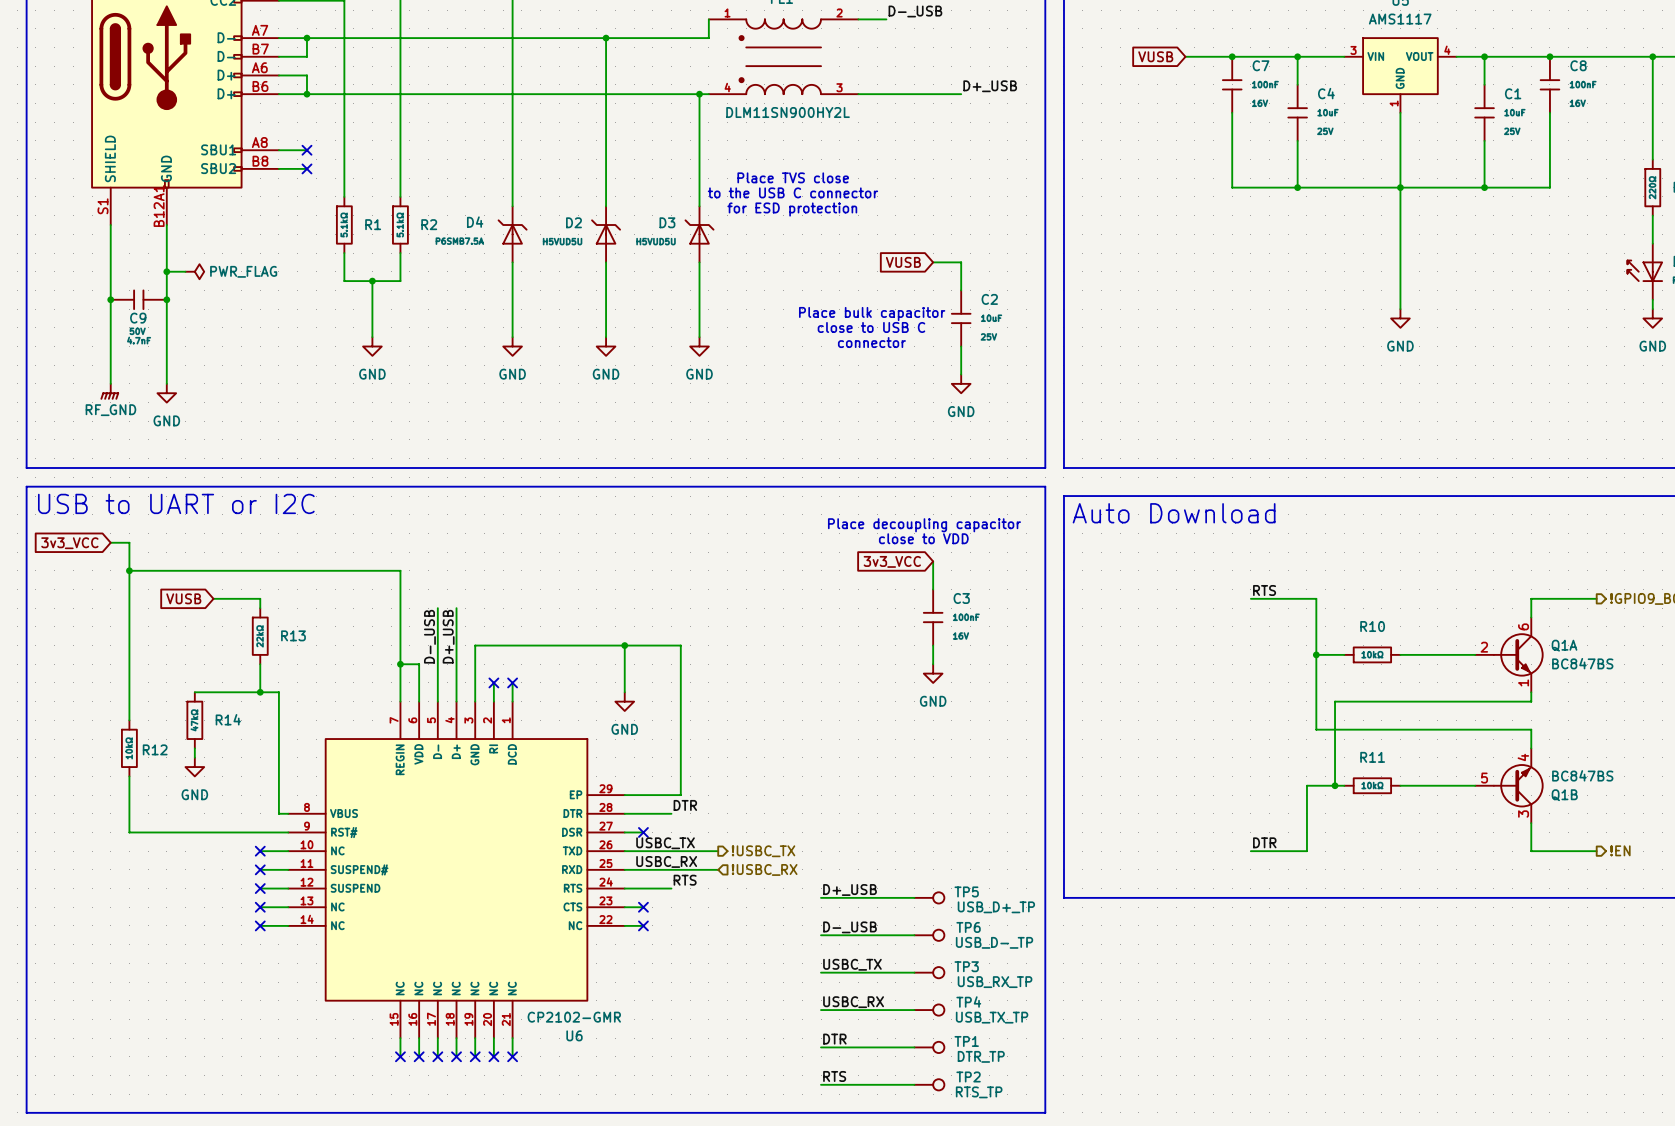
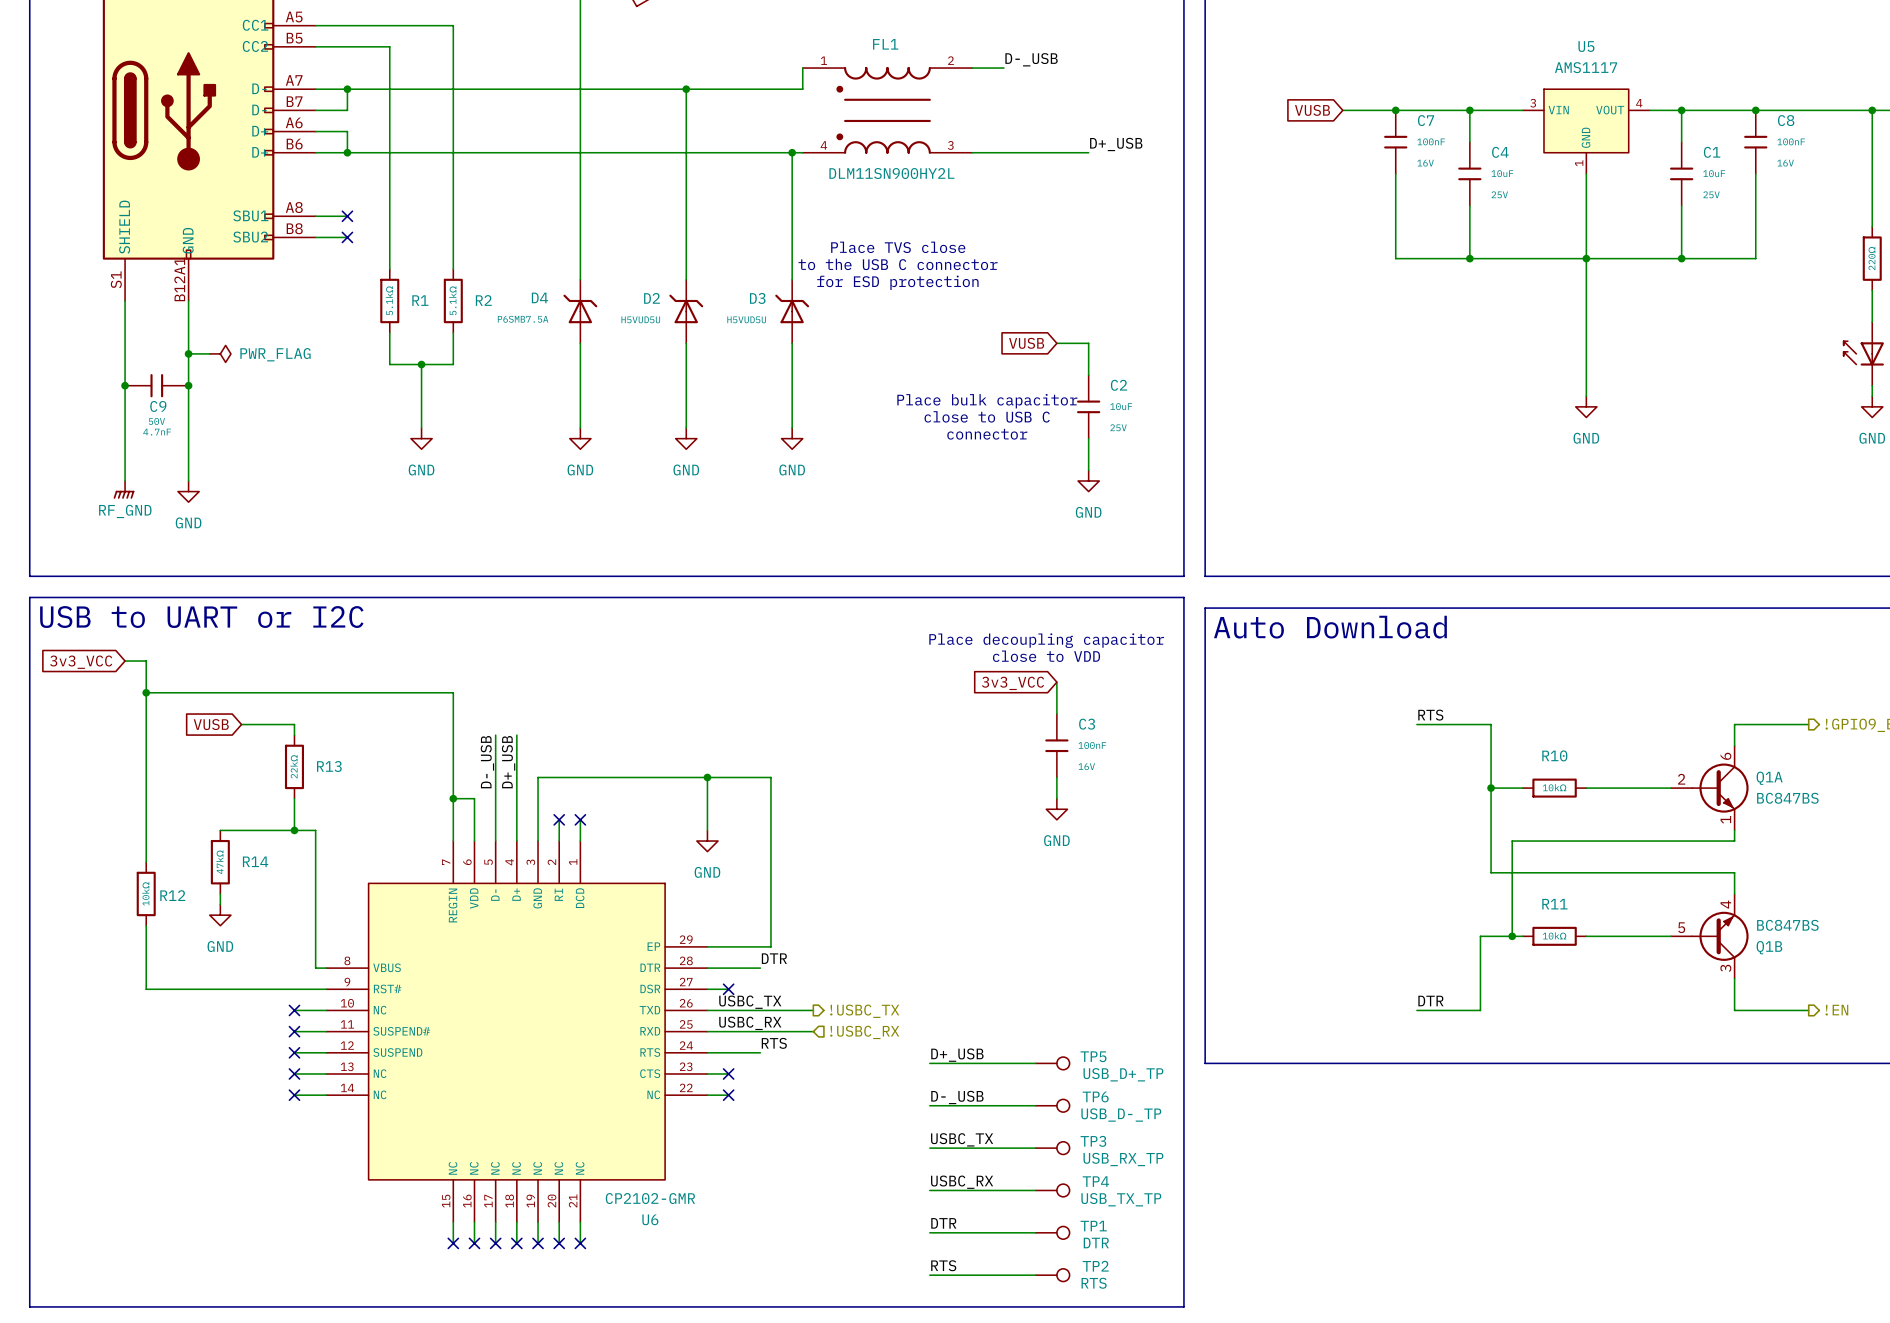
TP1 value: DTR_TP (981, 1056) -> DTR (1096, 1243)
TP2 value: RTS_TP (979, 1092) -> RTS (1094, 1283)

